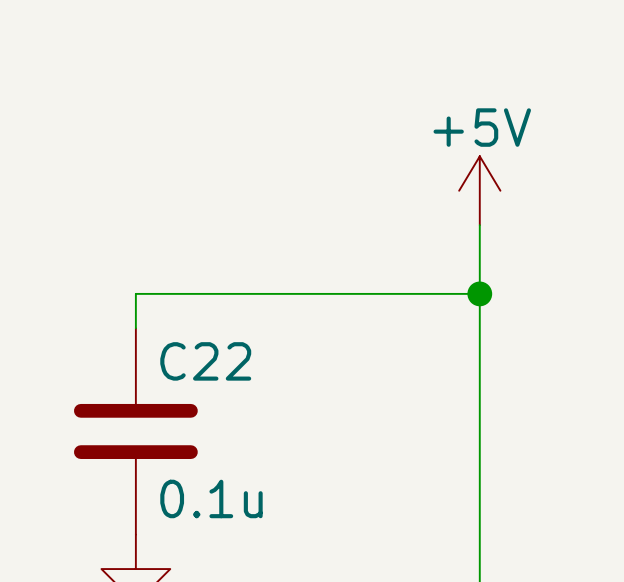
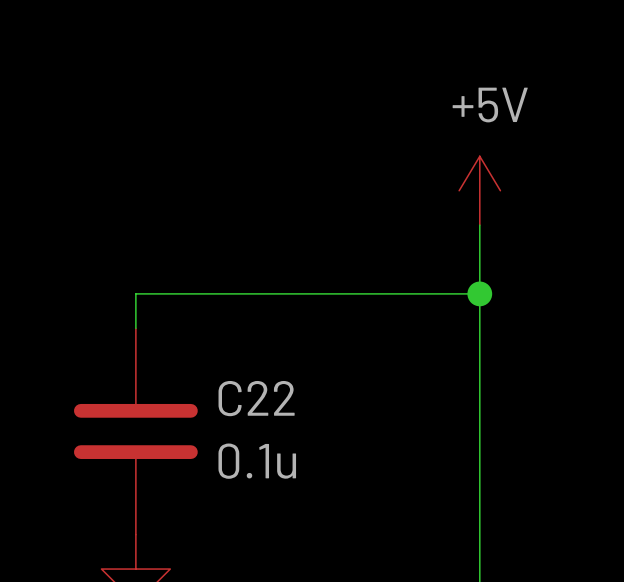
power symbol text position: +5V (482, 127) -> +5V (490, 105)
C22 name position: C22 (205, 361) -> C22 (256, 398)
C22 value position: 0.1u (211, 498) -> 0.1u (257, 461)

